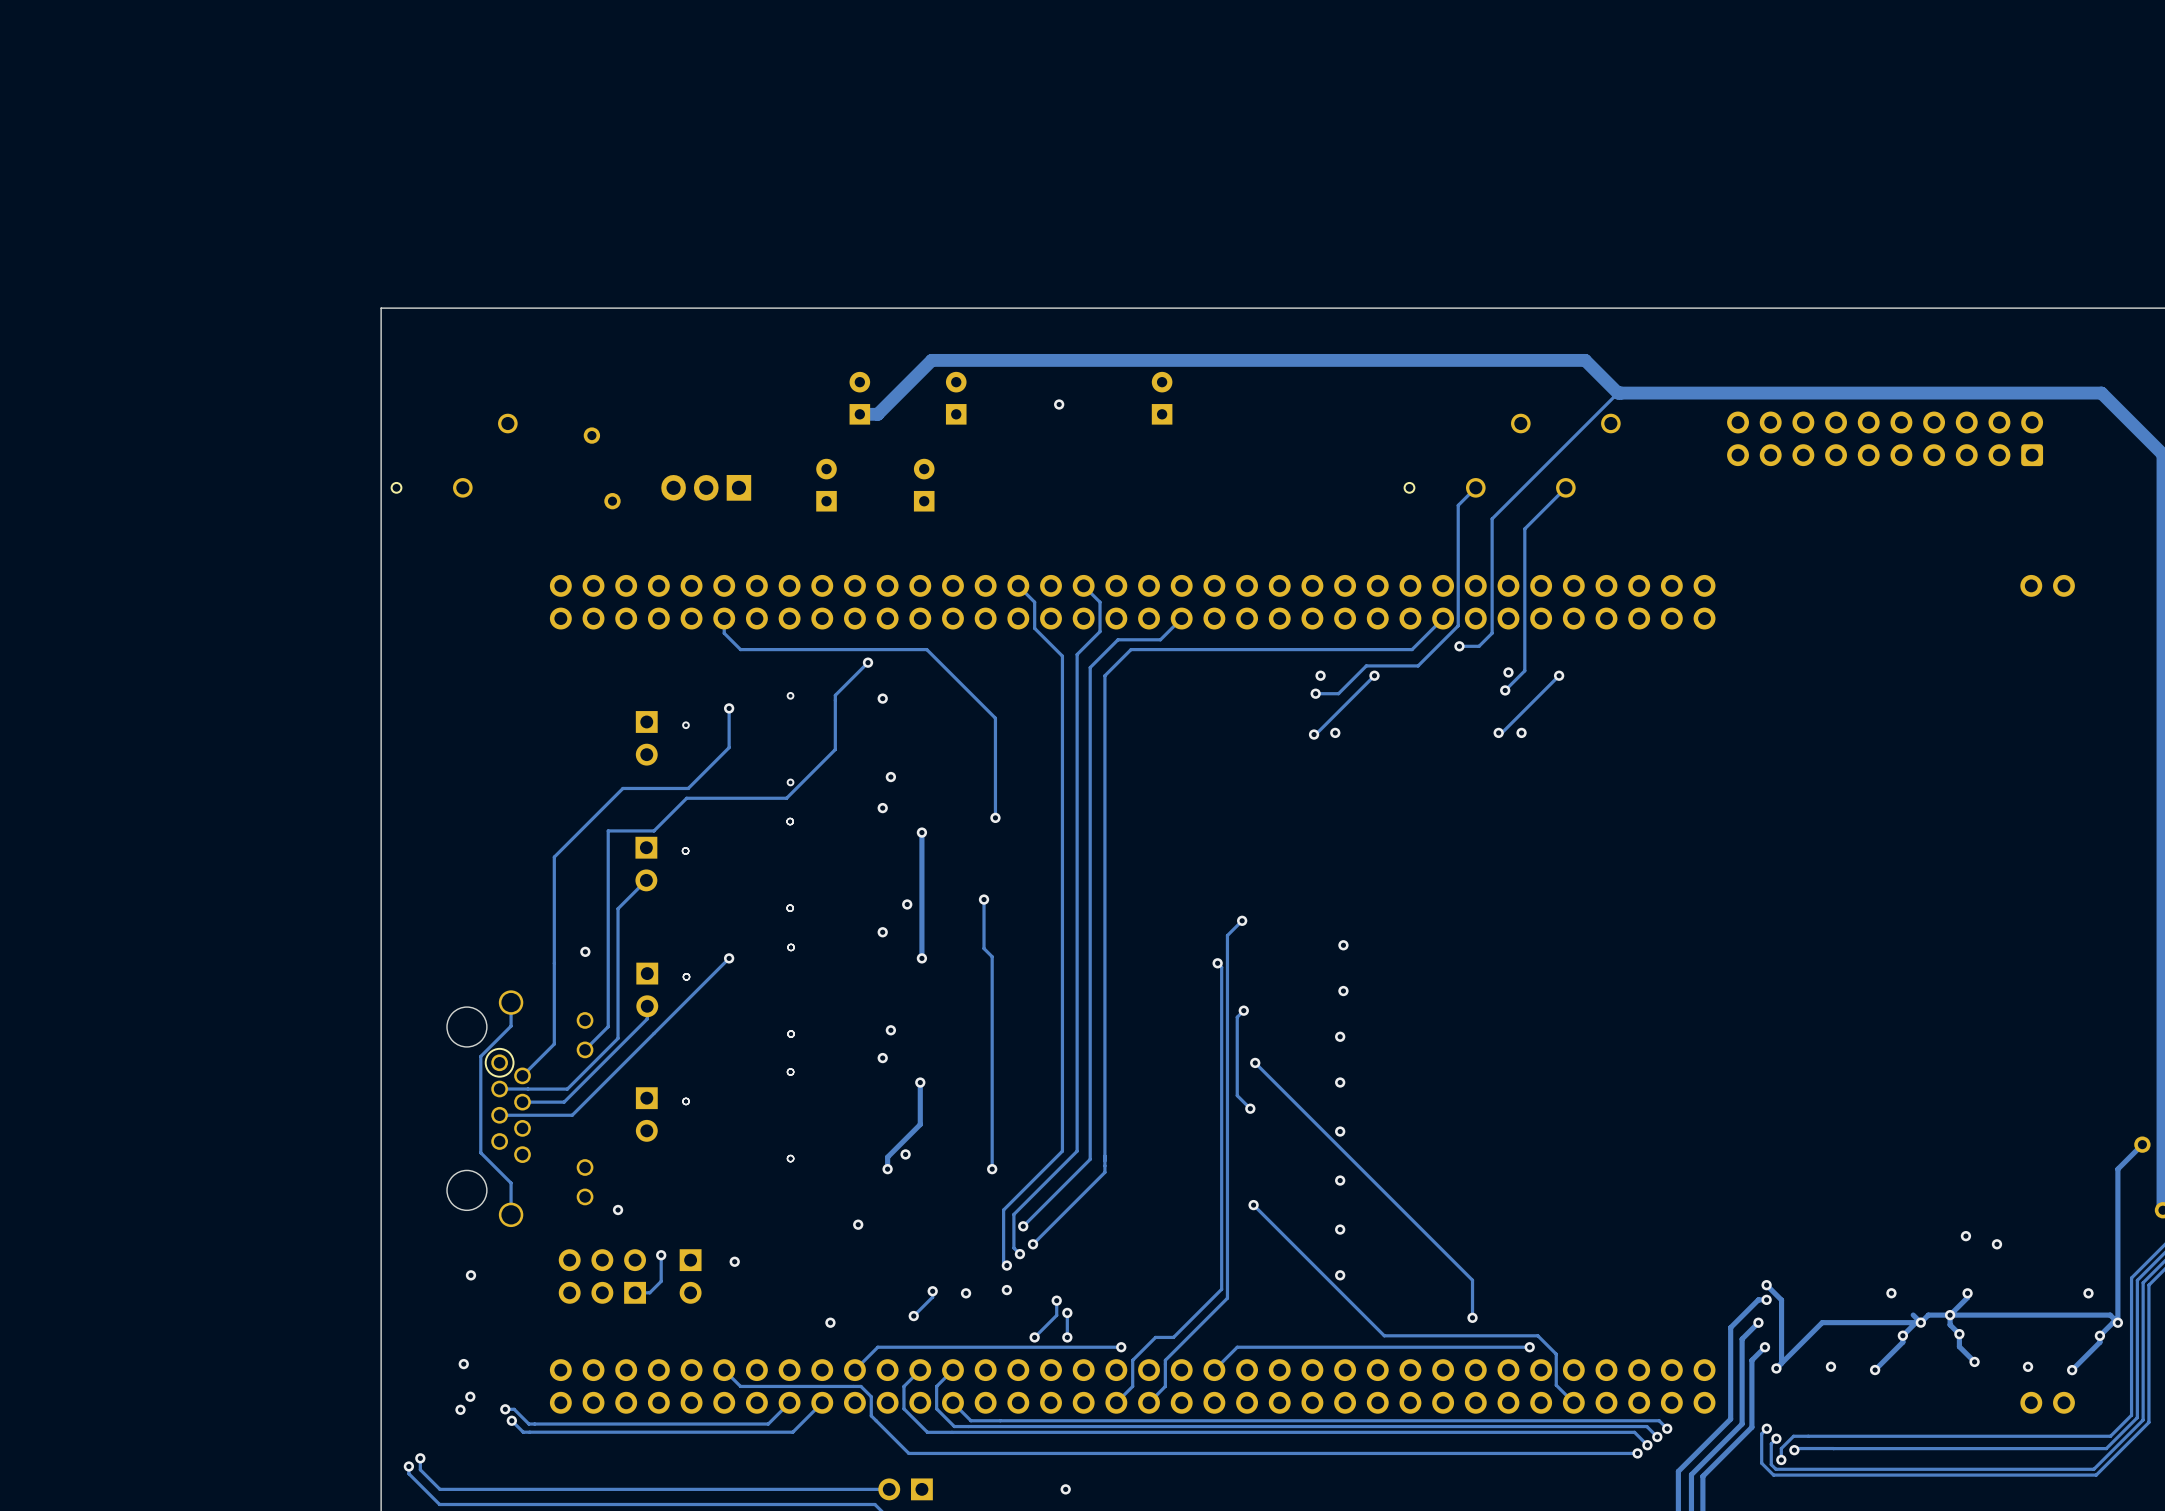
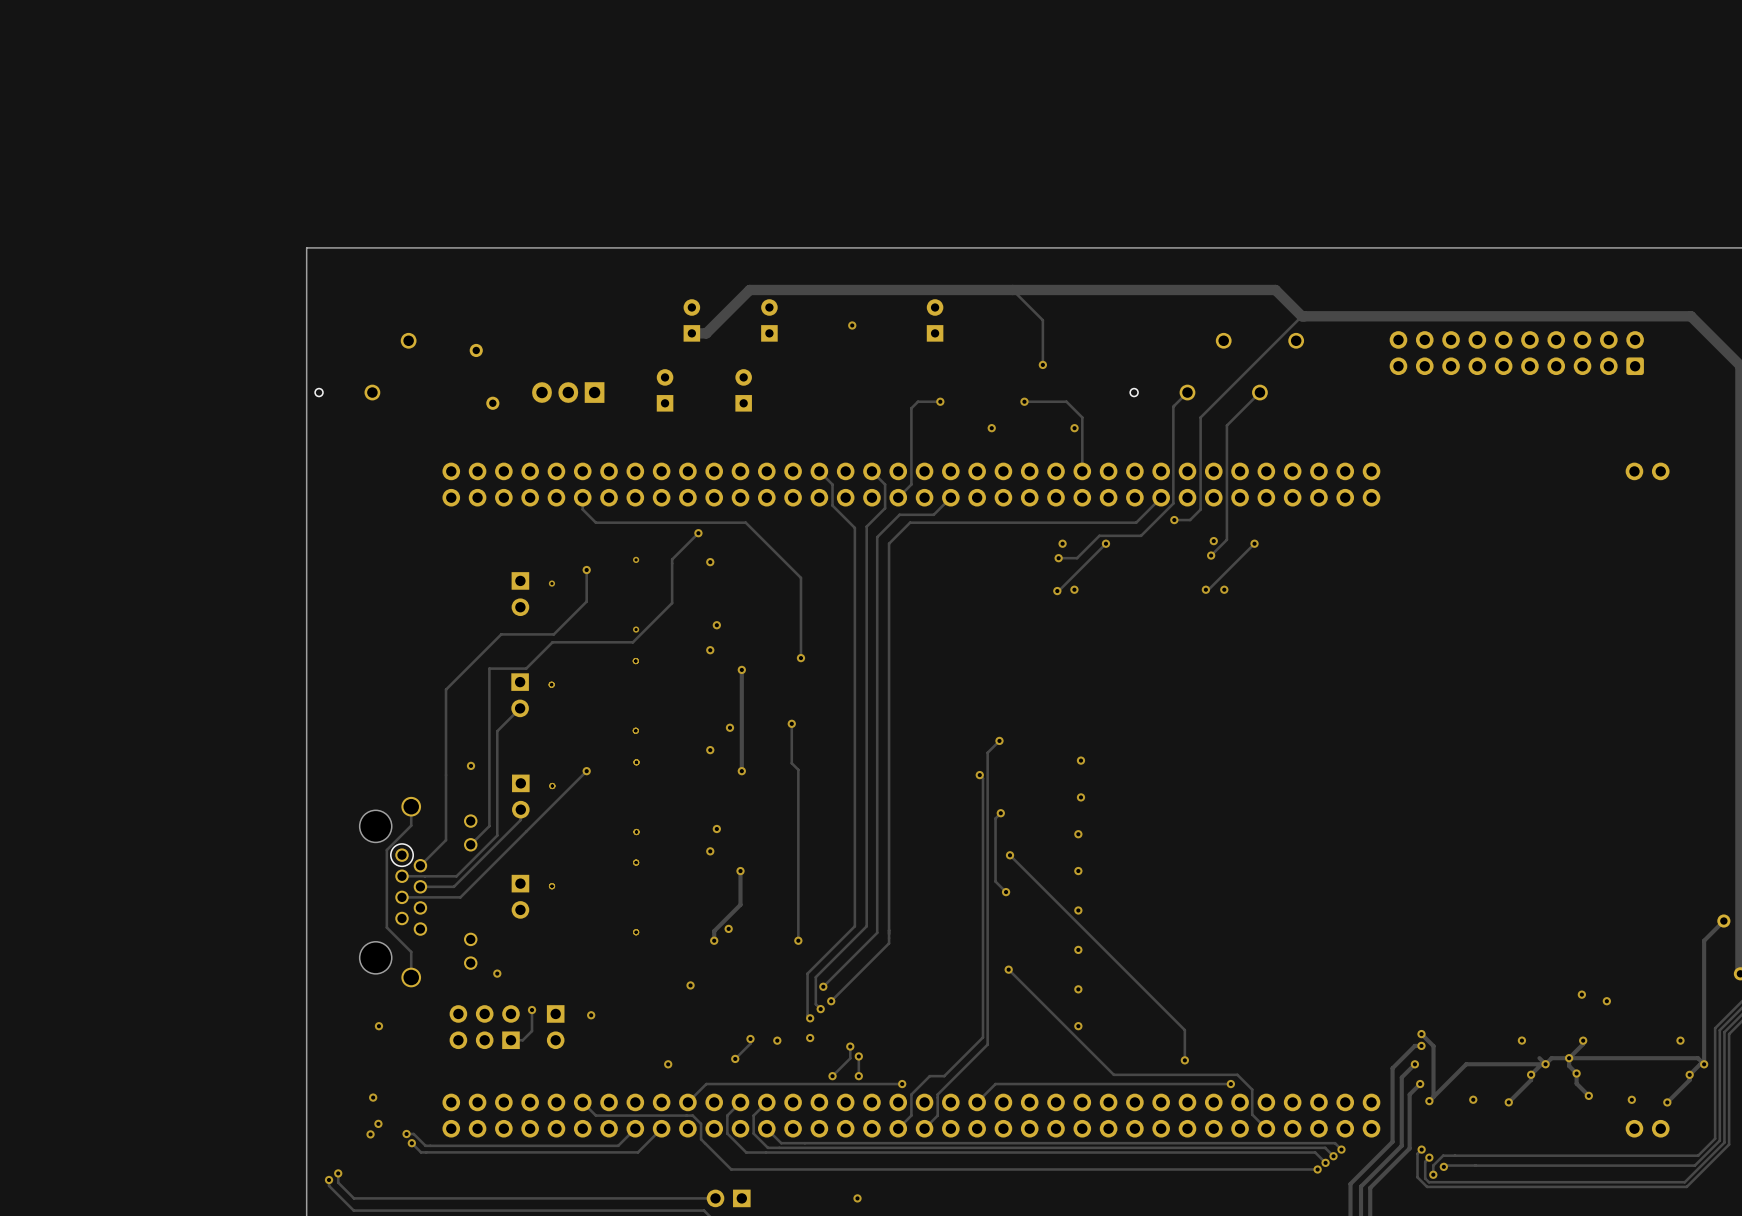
track: none -> (1012, 289) (1042, 320) (1042, 364)
via: none -> (1042, 364)
track: none -> (940, 401) (917, 401) (911, 408) (911, 484) (898, 497)
via: none -> (940, 401)
track: none -> (1024, 401) (1066, 401) (1082, 417) (1082, 471)
via: none -> (1024, 401)
via: none -> (991, 428)
via: none -> (1074, 428)

